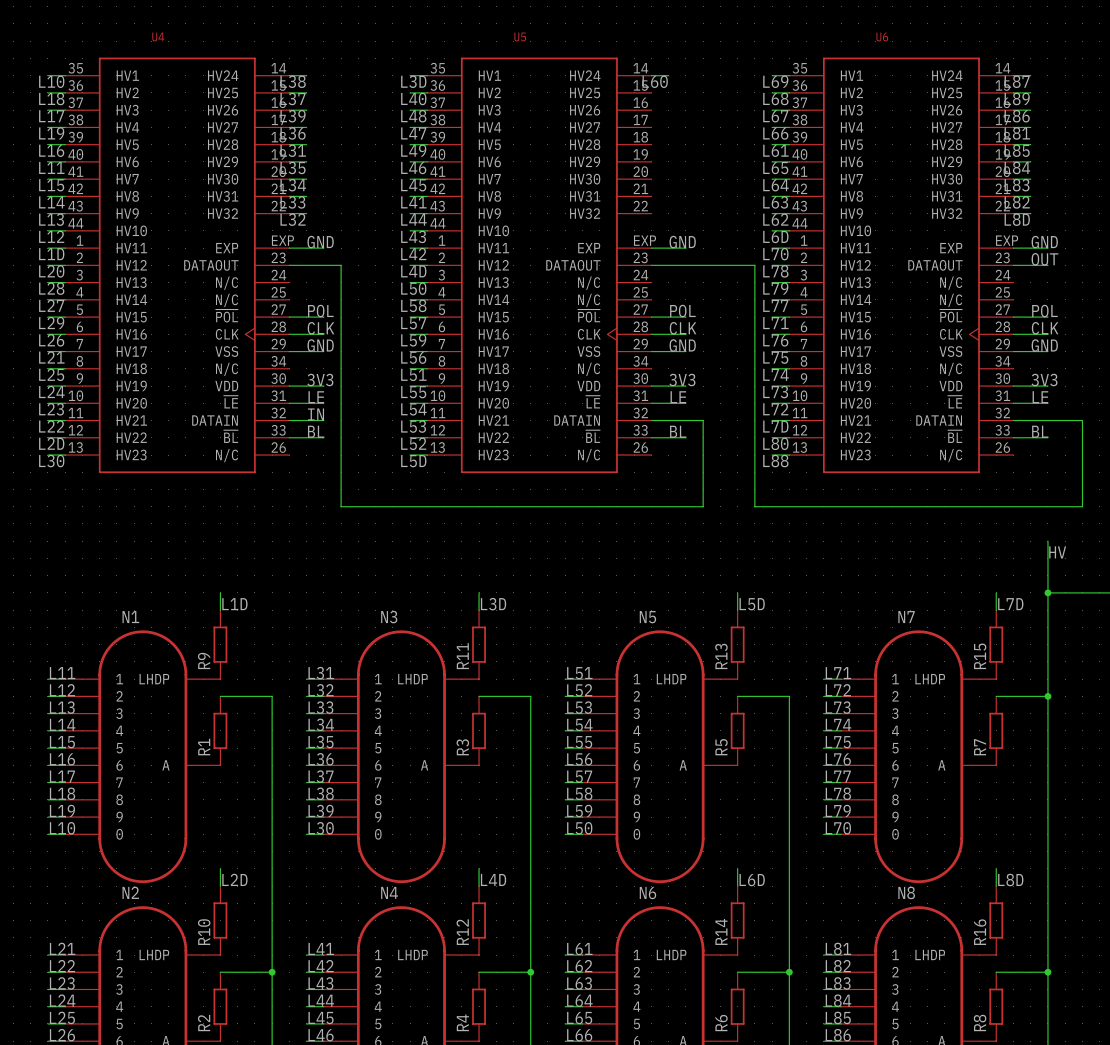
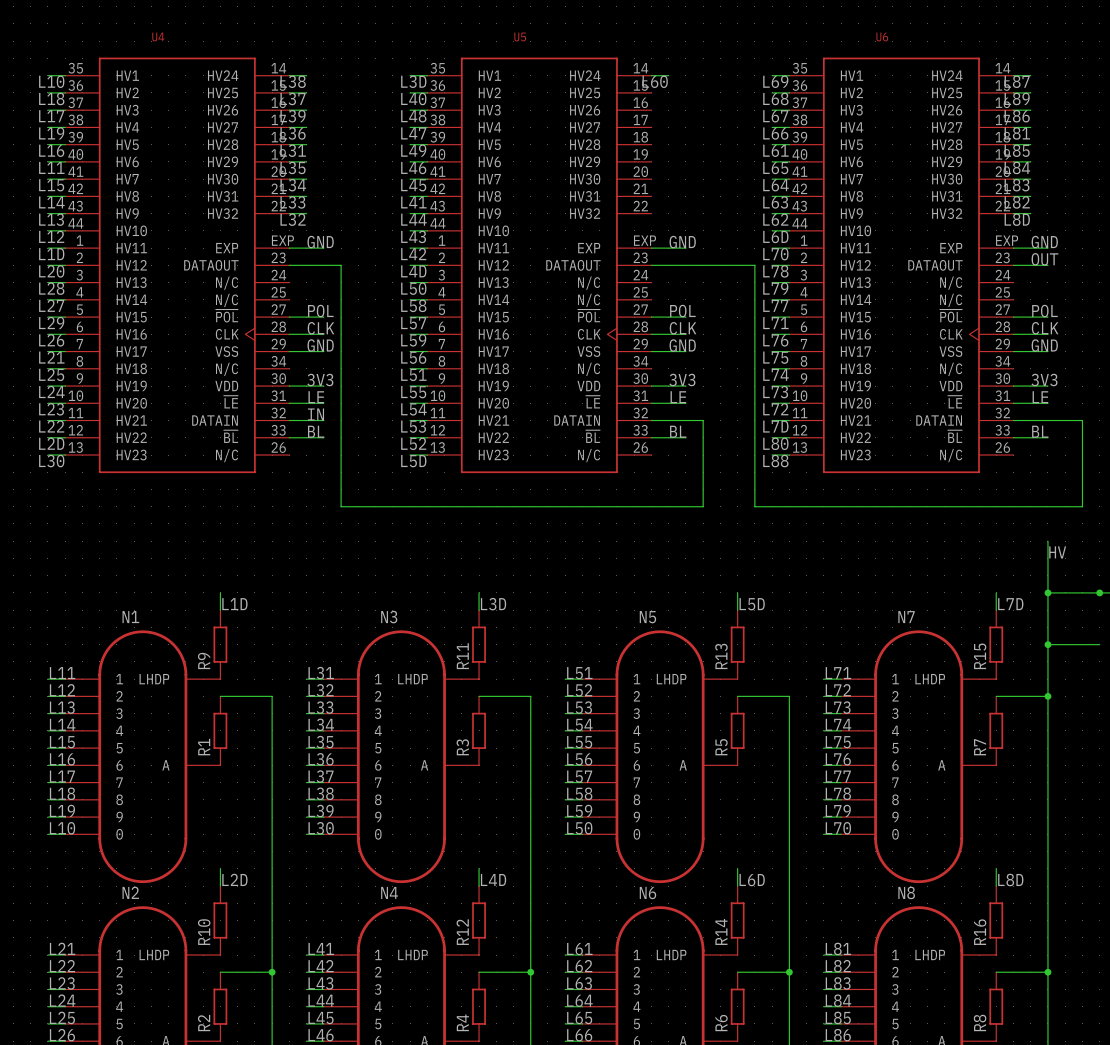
junction: none -> (1099, 592)
wire: none -> (1047, 644) (1099, 644)
junction: none -> (1047, 644)

